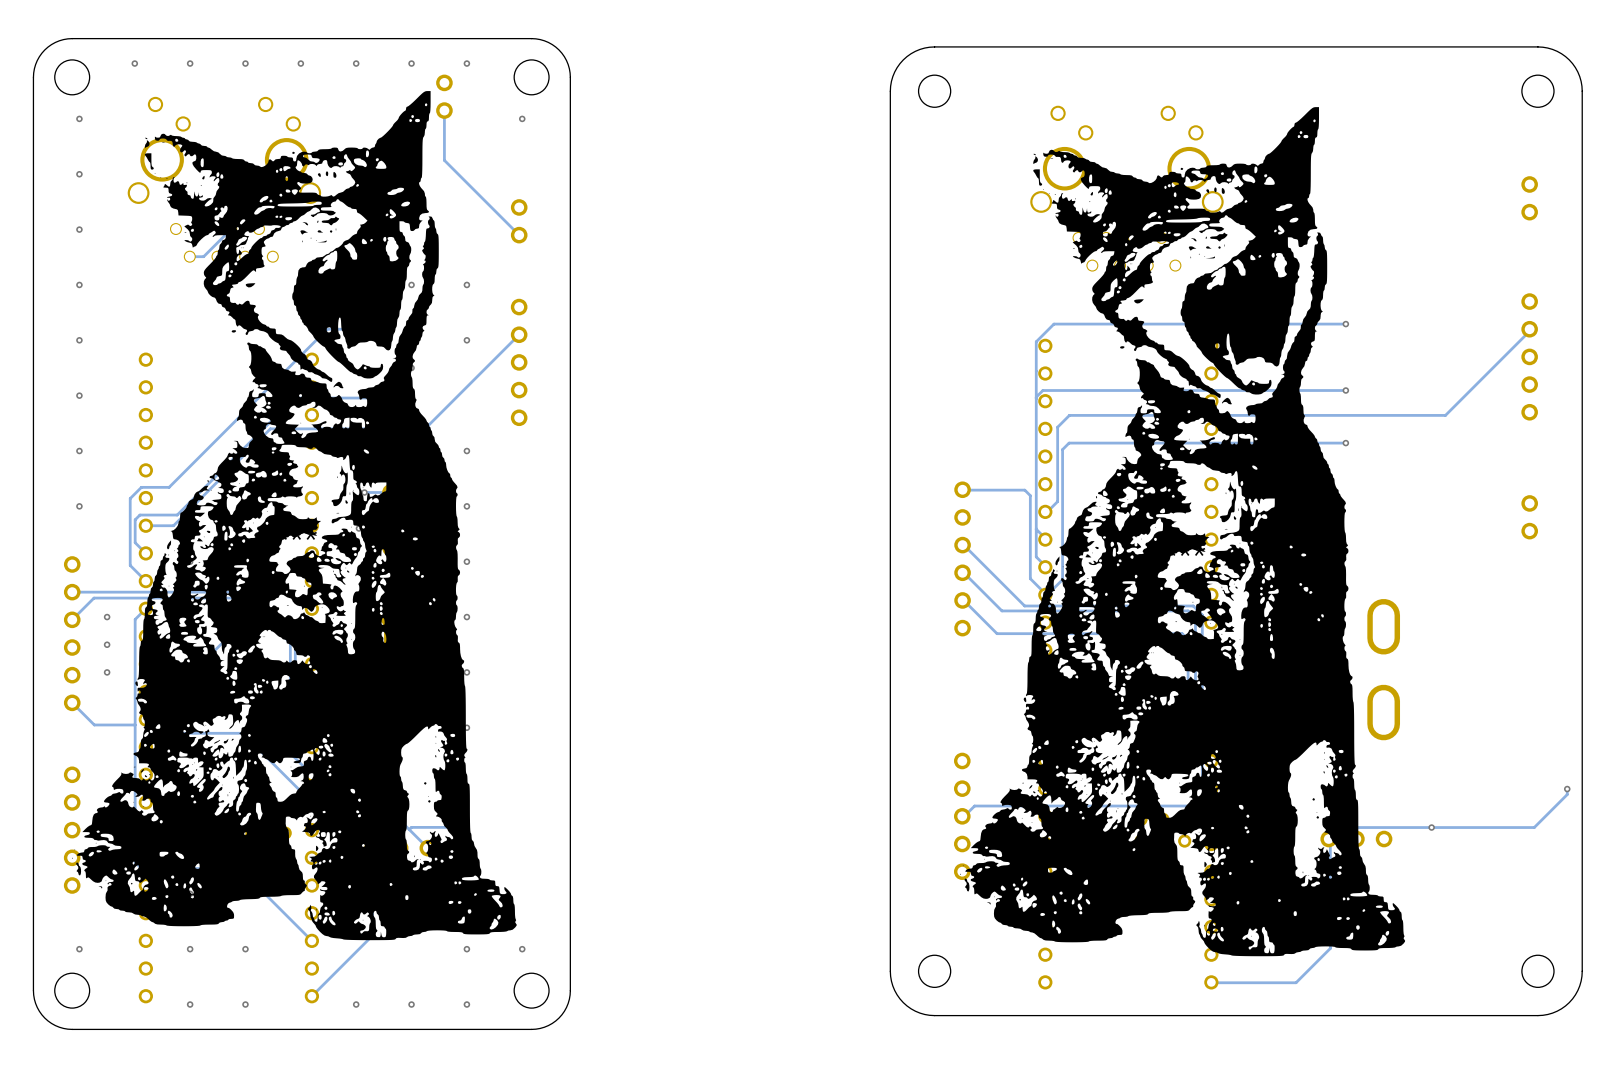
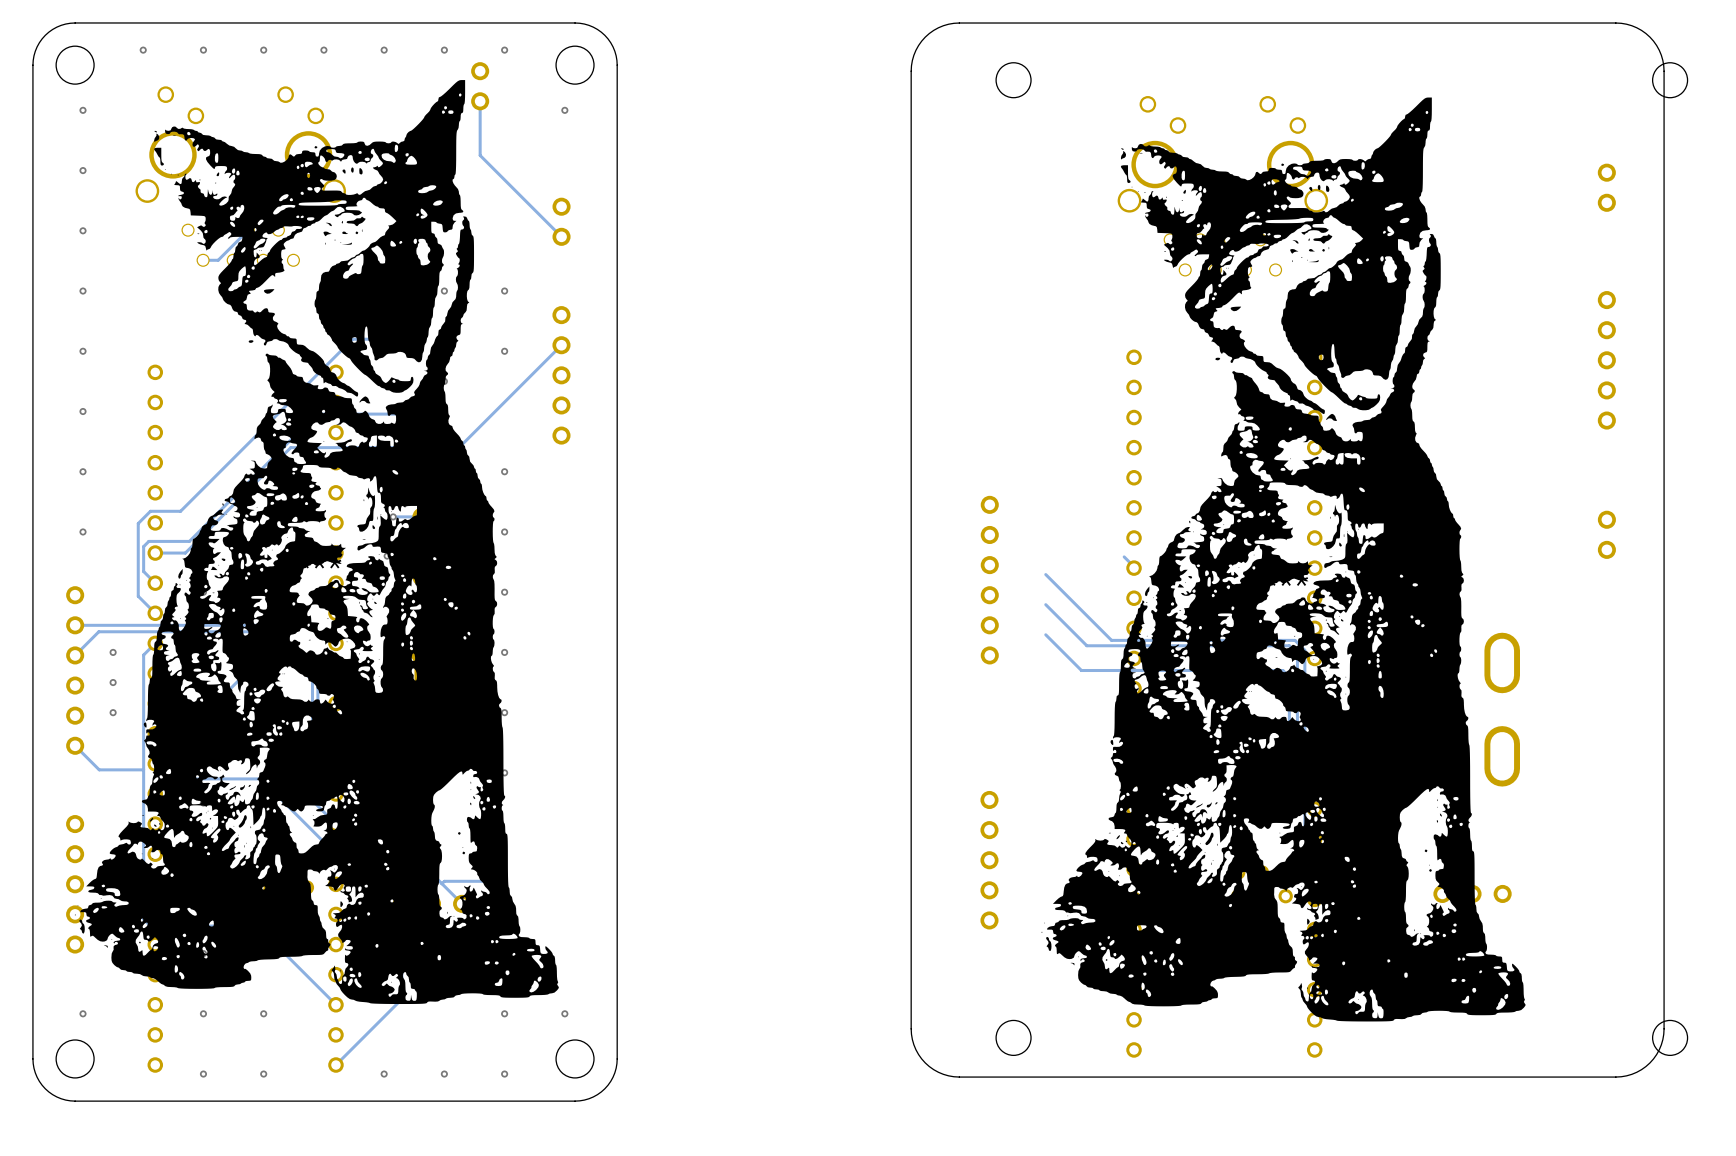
board edge: (1537, 46) (934, 46) (915, 51) (903, 59) (897, 67) (891, 81) (890, 91) (890, 971) (894, 990) (899, 998) (911, 1008) (919, 1013) (934, 1015) (1537, 1015) (1557, 1011) (1569, 1002) (1575, 994) (1581, 981) (1582, 971) (1582, 91) (1577, 72) (1569, 59) (1557, 51) (1537, 46) -> (1615, 23) (959, 23) (938, 27) (925, 37) (918, 45) (912, 60) (911, 71) (911, 1028) (913, 1044) (918, 1054) (933, 1069) (943, 1074) (959, 1077) (1615, 1077) (1636, 1072) (1649, 1062) (1656, 1054) (1661, 1044) (1664, 1028) (1664, 71) (1659, 50) (1649, 37) (1636, 27) (1615, 23)
part position: (1529, 198) -> (1606, 187)
track: (1345, 324) (1053, 324) (1036, 341) (1036, 556) (1046, 567) -> none
via: (1345, 324) -> none
track: (1531, 329) (1445, 415) (1069, 415) (1057, 427) (1057, 501) (1046, 512) -> none
part position: (1529, 356) -> (1606, 360)
track: (1345, 390) (1042, 390) (1036, 397) -> none
via: (1345, 390) -> none
track: (1345, 443) (1069, 443) (1062, 449) (1062, 579) (1046, 595) (1030, 578) (1030, 495) (1024, 490) (964, 490) -> none
via: (1345, 443) -> none
part position: (1529, 517) -> (1606, 534)
part position: (962, 558) -> (989, 580)
track: (1567, 789) (1567, 794) (1534, 827) (1342, 827) (1330, 839) (1330, 948) (1296, 982) (1213, 982) -> none
via: (1567, 789) -> none
part position: (962, 816) -> (989, 860)
track: (1213, 816) (1202, 806) (974, 806) (963, 816) -> none
via: (1431, 827) -> none

